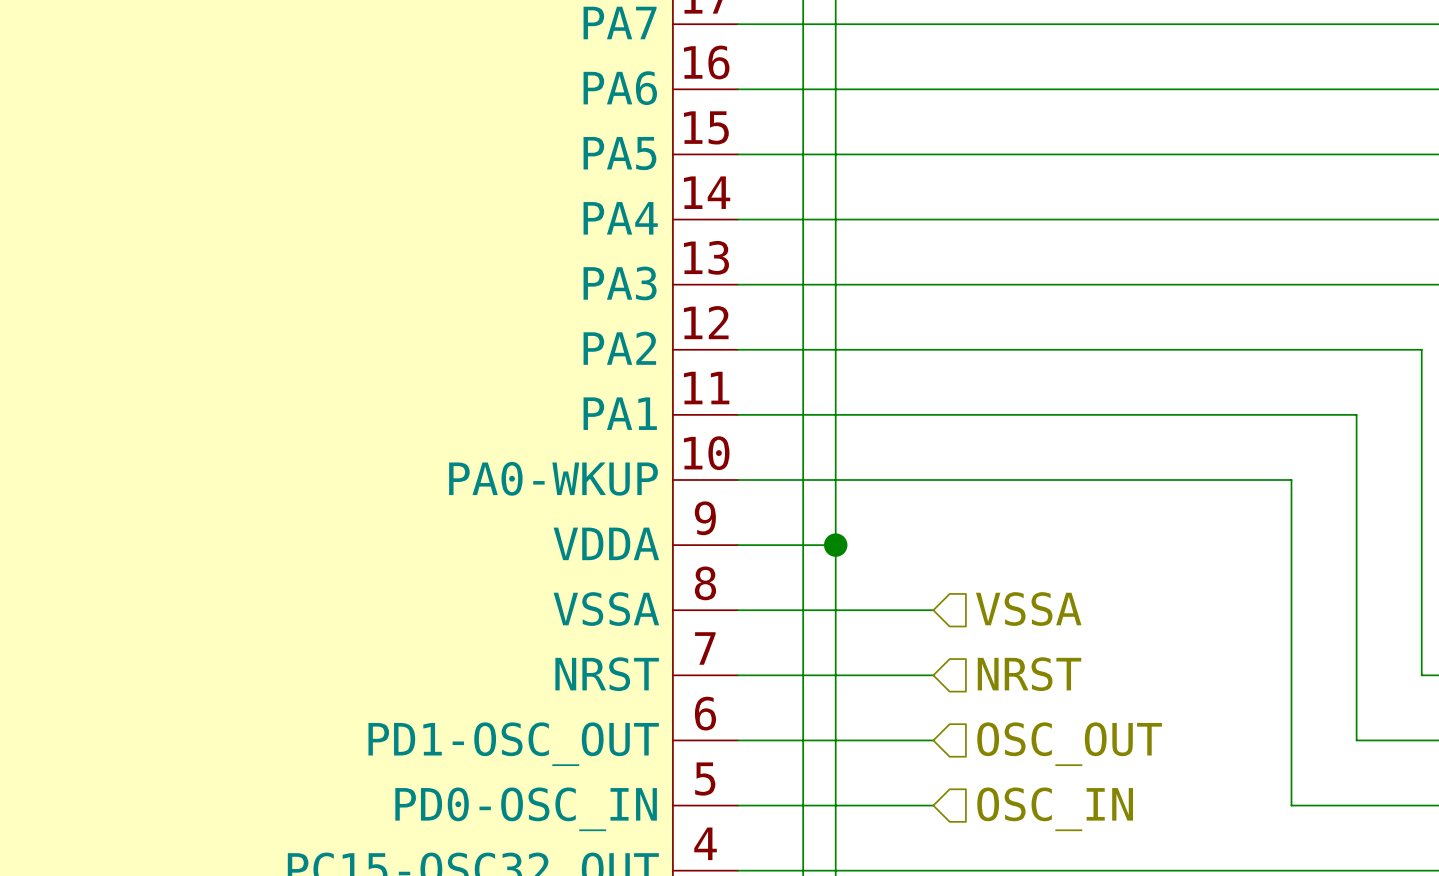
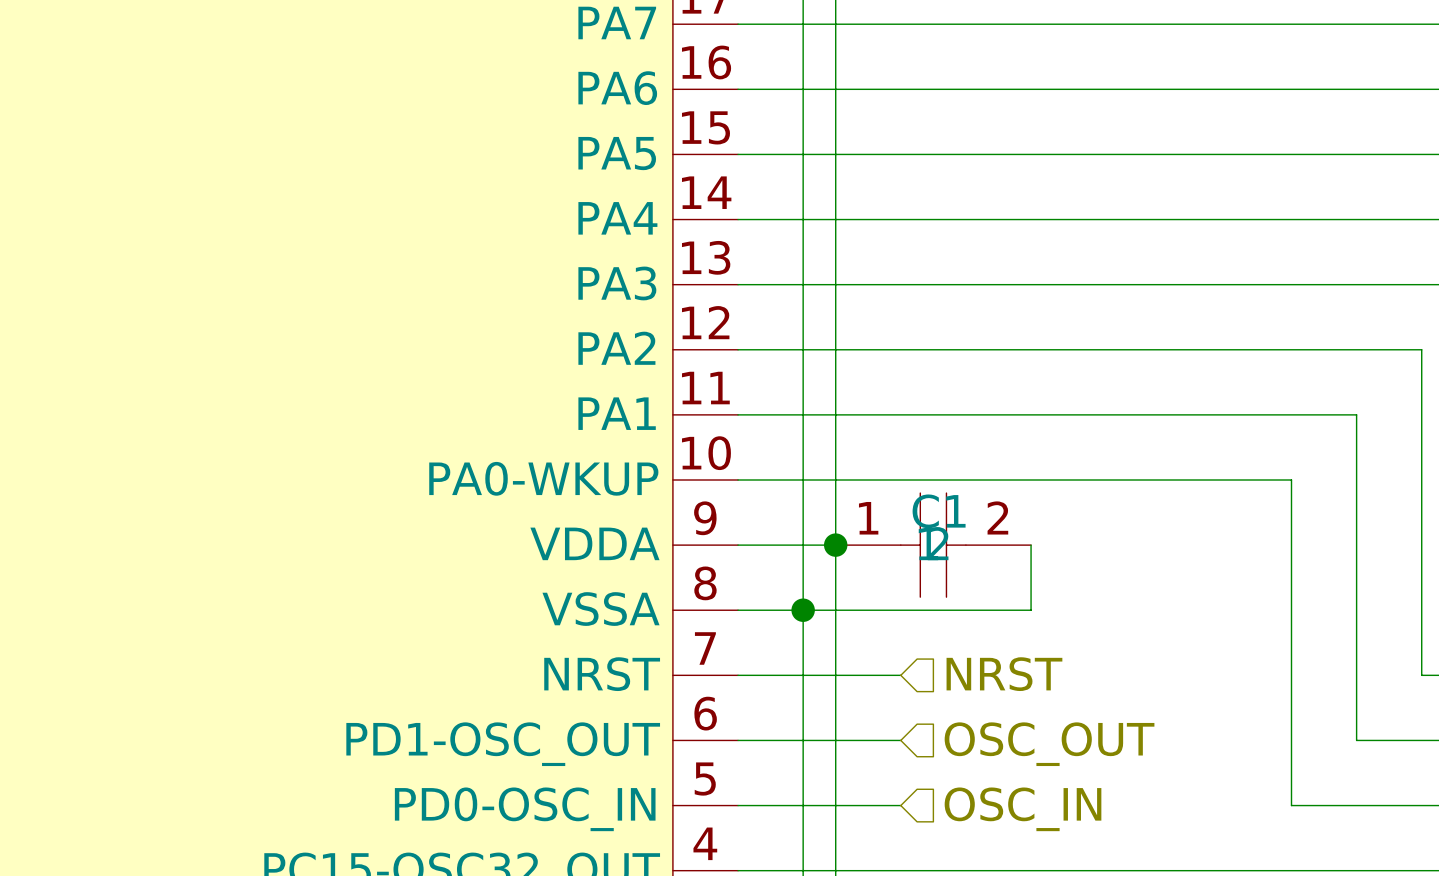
C1: none -> (933, 545)
wire: none -> (1031, 545) (1031, 610) (933, 610)
hierarchical label: VSSA (1028, 609) -> none
junction: none -> (803, 610)
hierarchical label position: NRST (1029, 674) -> NRST (1004, 674)
wire: (900, 675) (933, 675) -> none
wire: (900, 740) (933, 740) -> none
hierarchical label position: OSC_OUT (1069, 744) -> OSC_OUT (1049, 744)
wire: (900, 805) (933, 805) -> none
hierarchical label position: OSC_IN (1055, 809) -> OSC_IN (1023, 809)

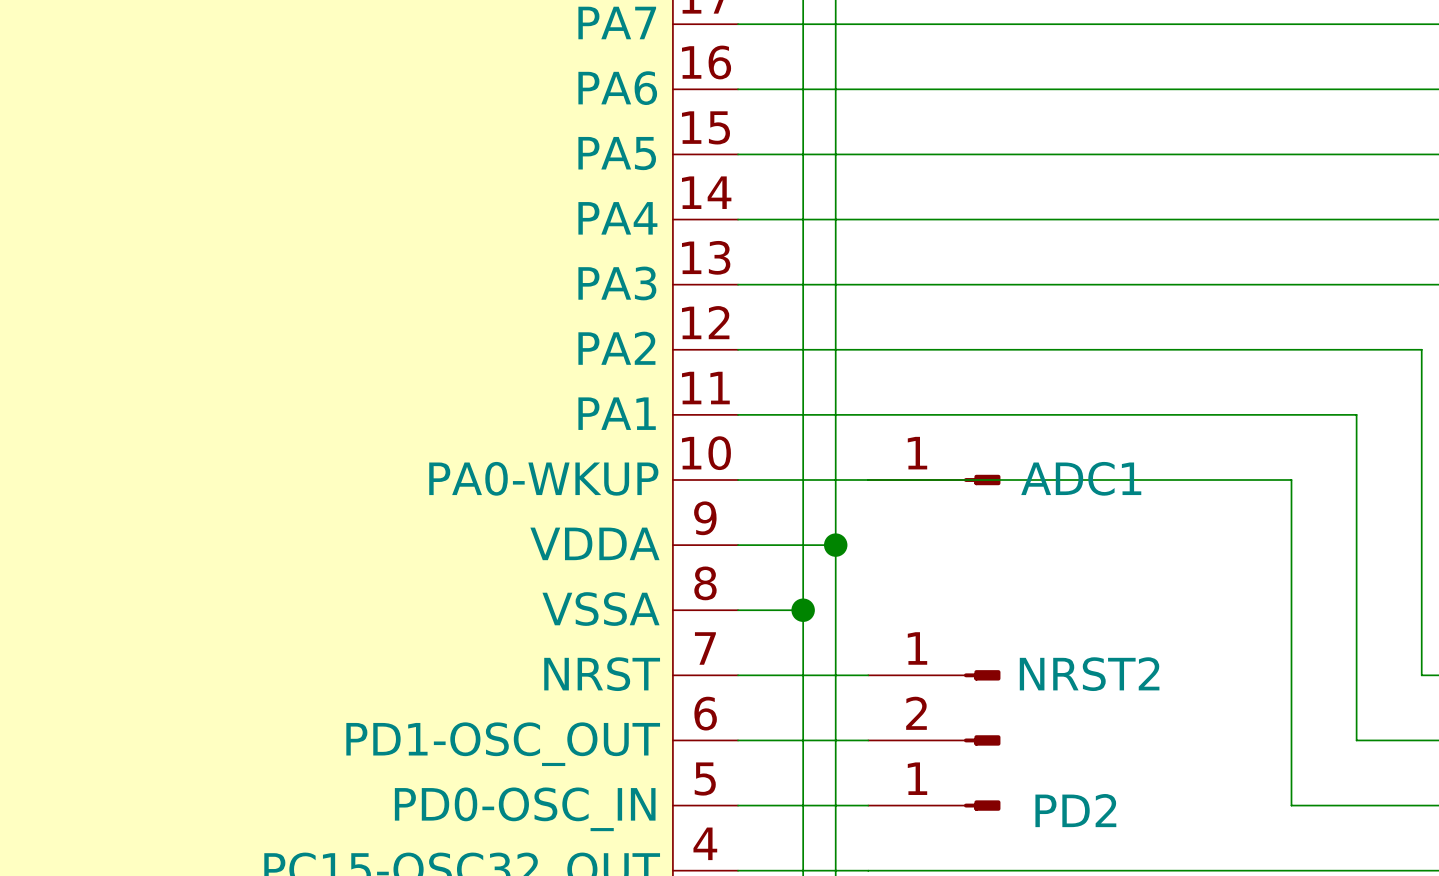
ADC1: none -> (934, 480)
C1: (933, 545) -> none
wire: (1031, 545) (1031, 610) (803, 610) -> none
hierarchical label: NRST (1004, 674) -> none
NRST2: none -> (934, 675)
hierarchical label: OSC_OUT (1049, 744) -> none
PD2: none -> (934, 773)
hierarchical label: OSC_IN (1023, 809) -> none

